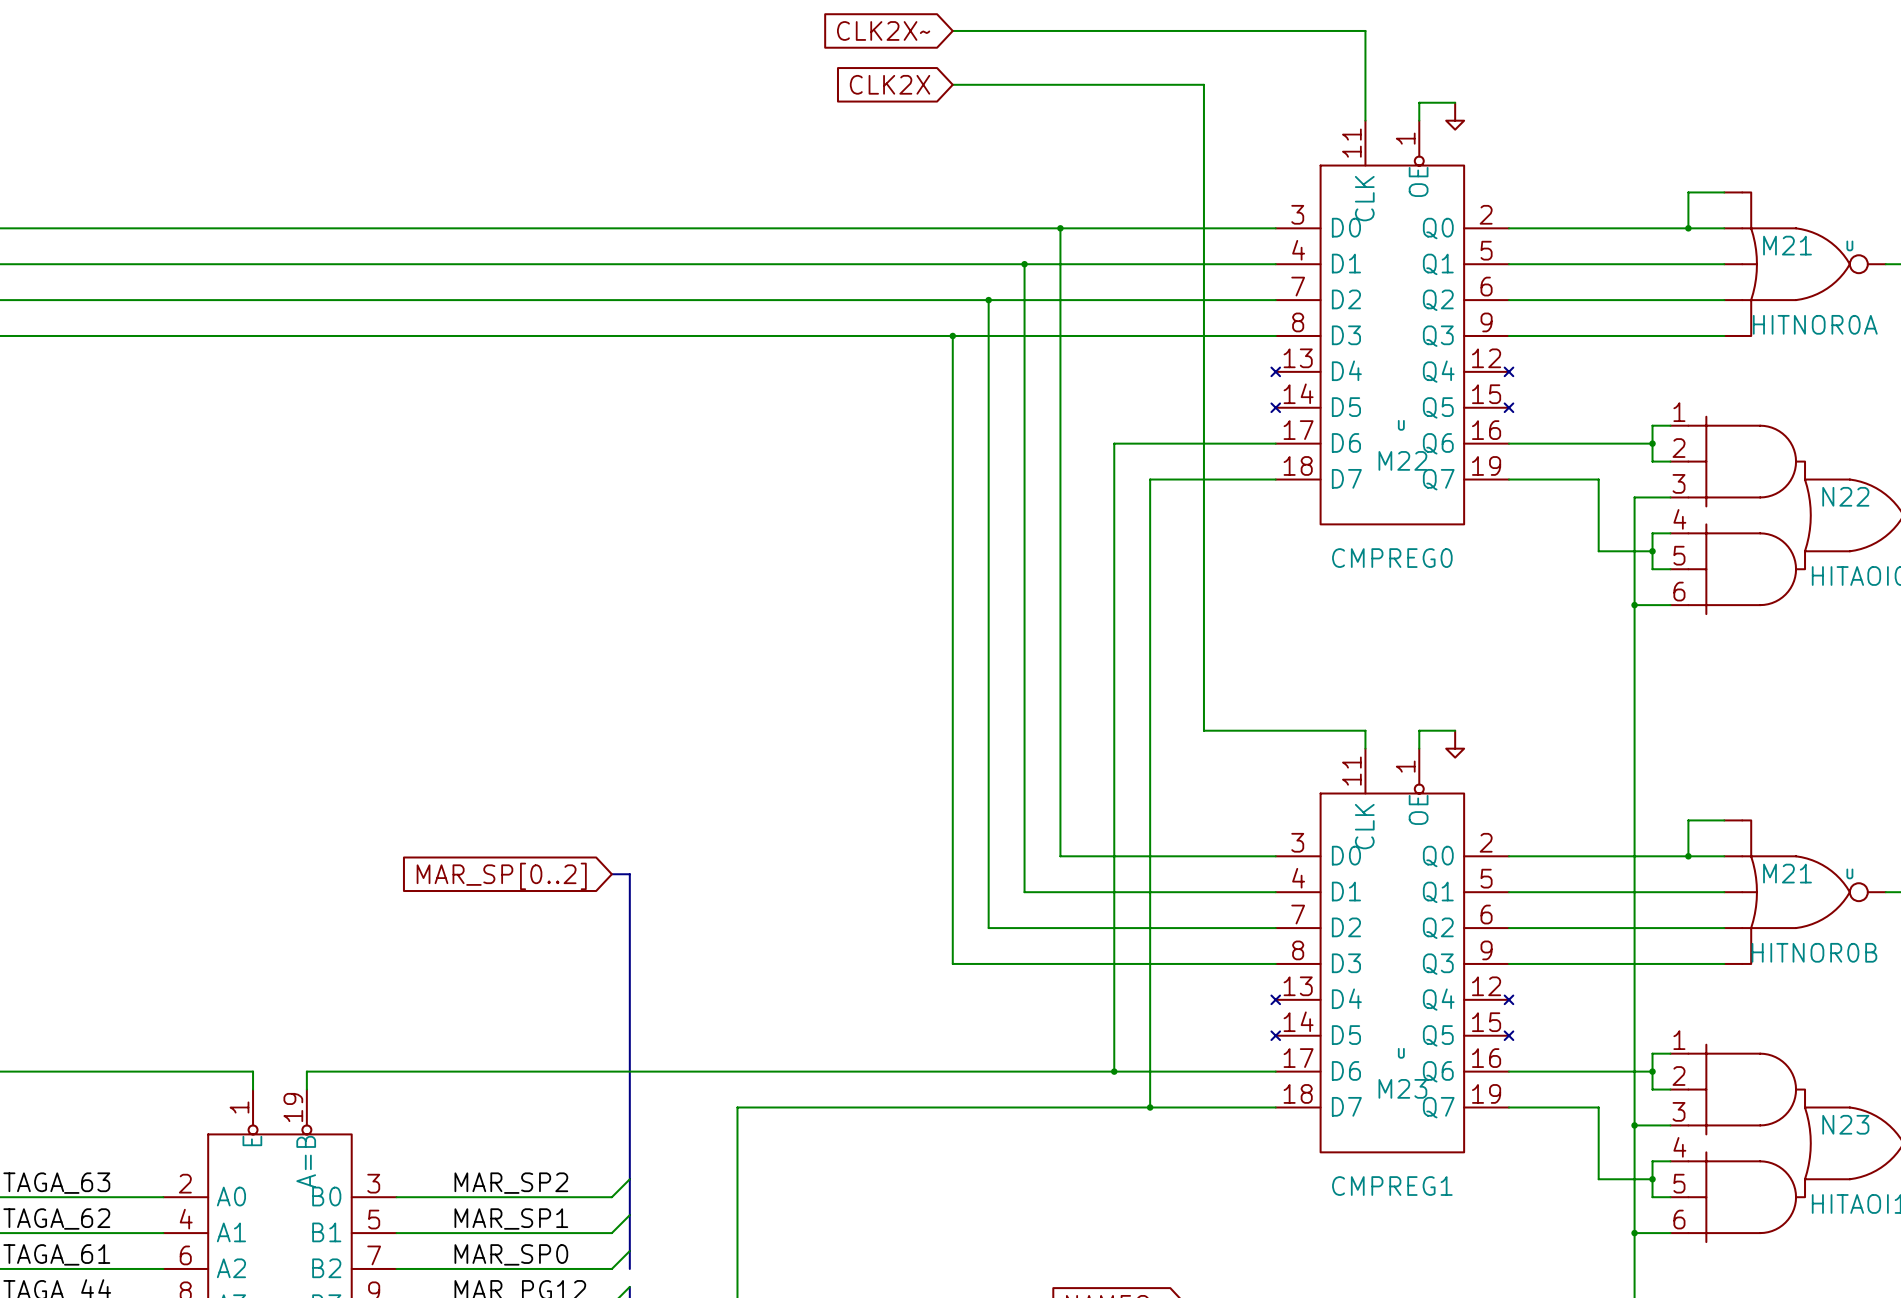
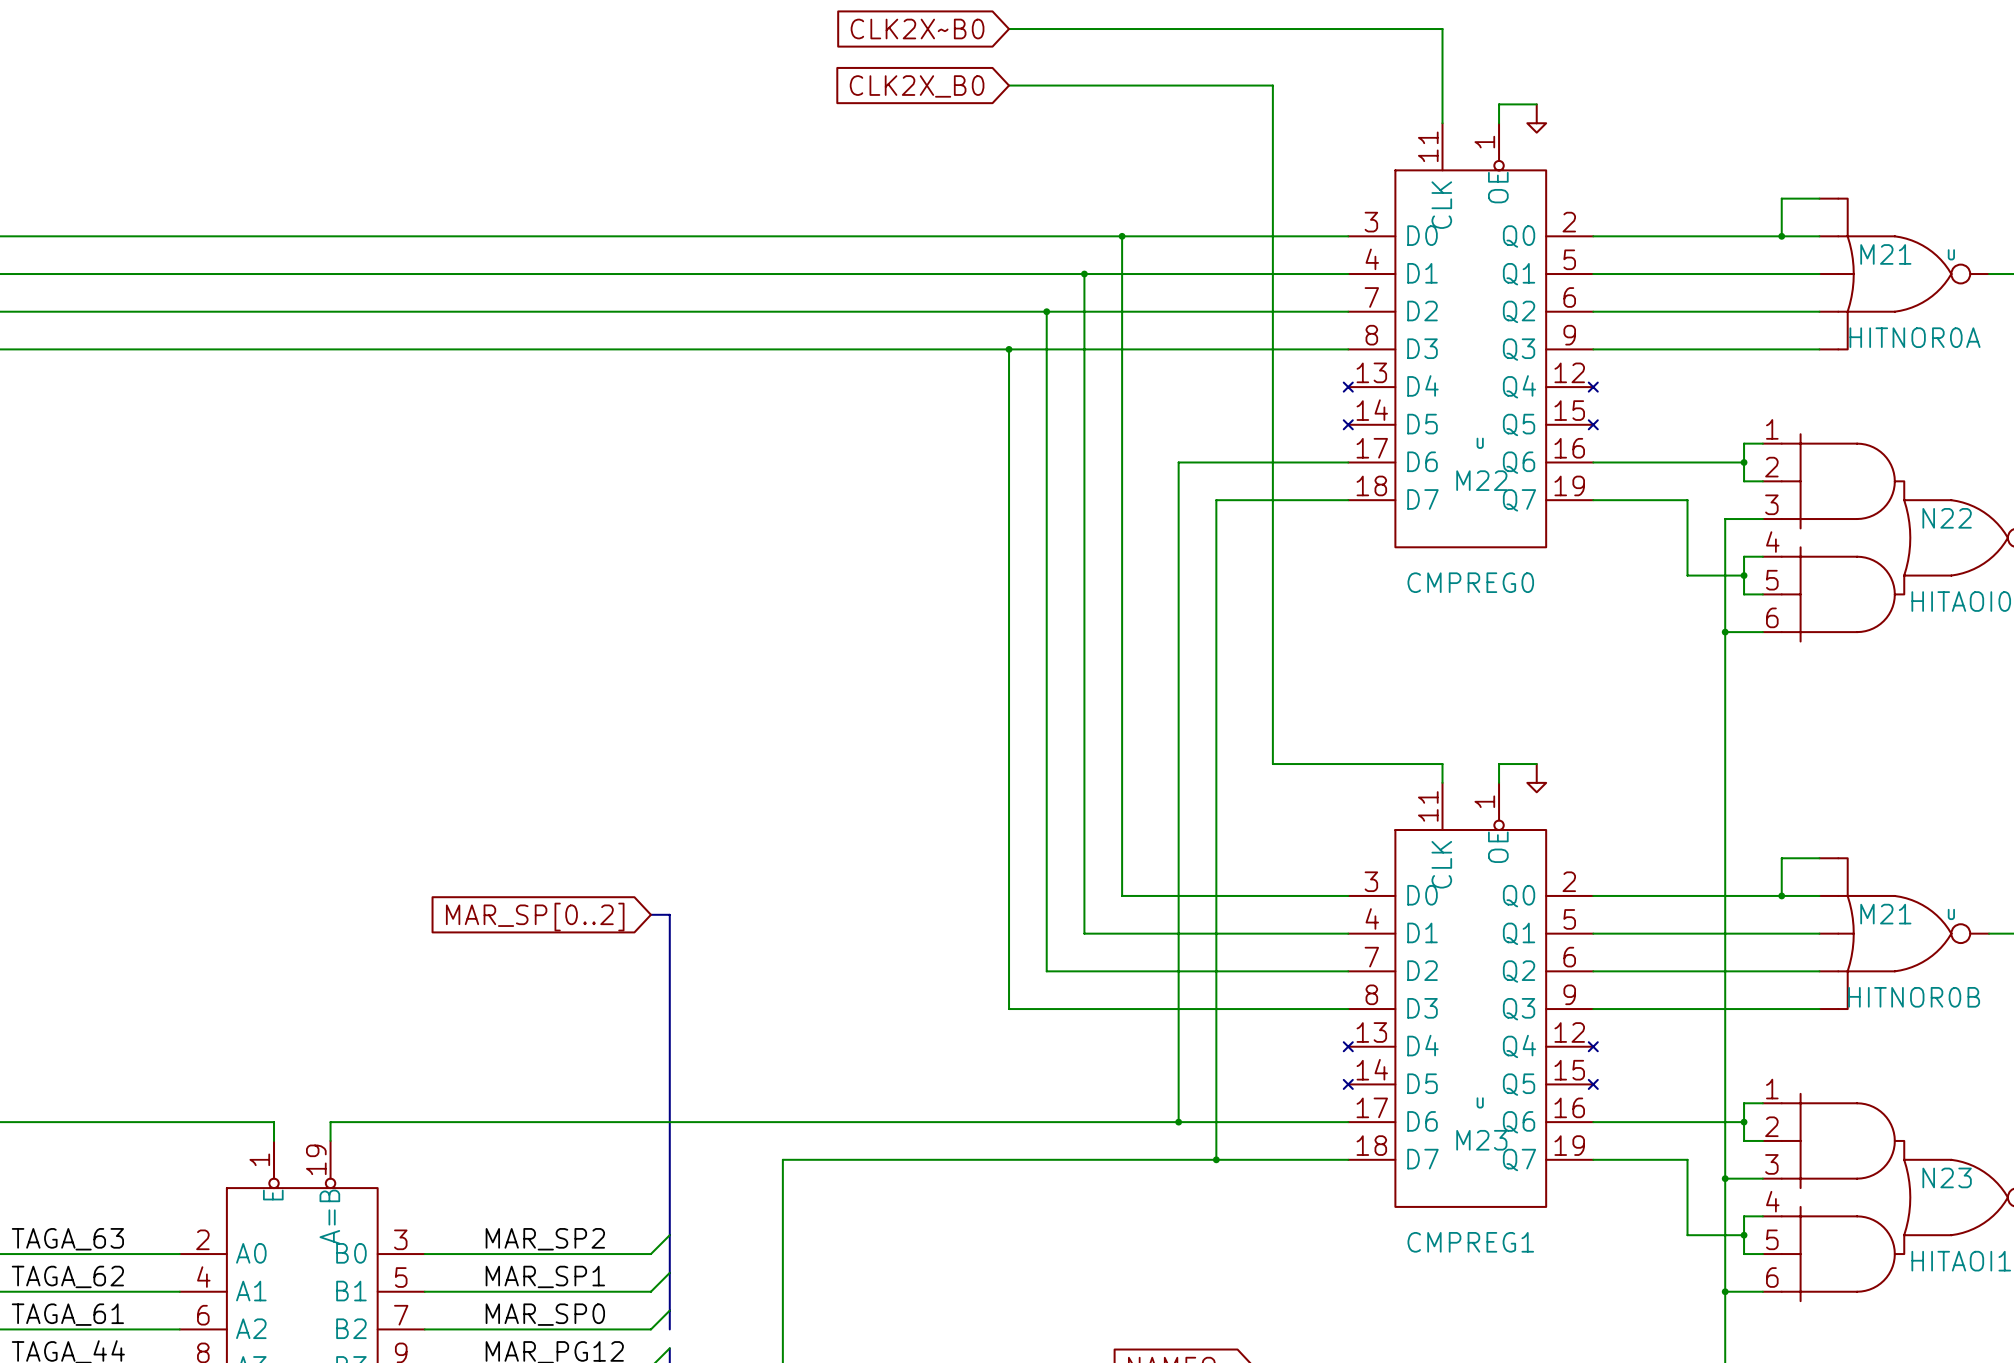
global label: CLK2X~ (883, 30) -> CLK2X~B0 (917, 29)
global label: CLK2X (890, 84) -> CLK2X_B0 (917, 86)

